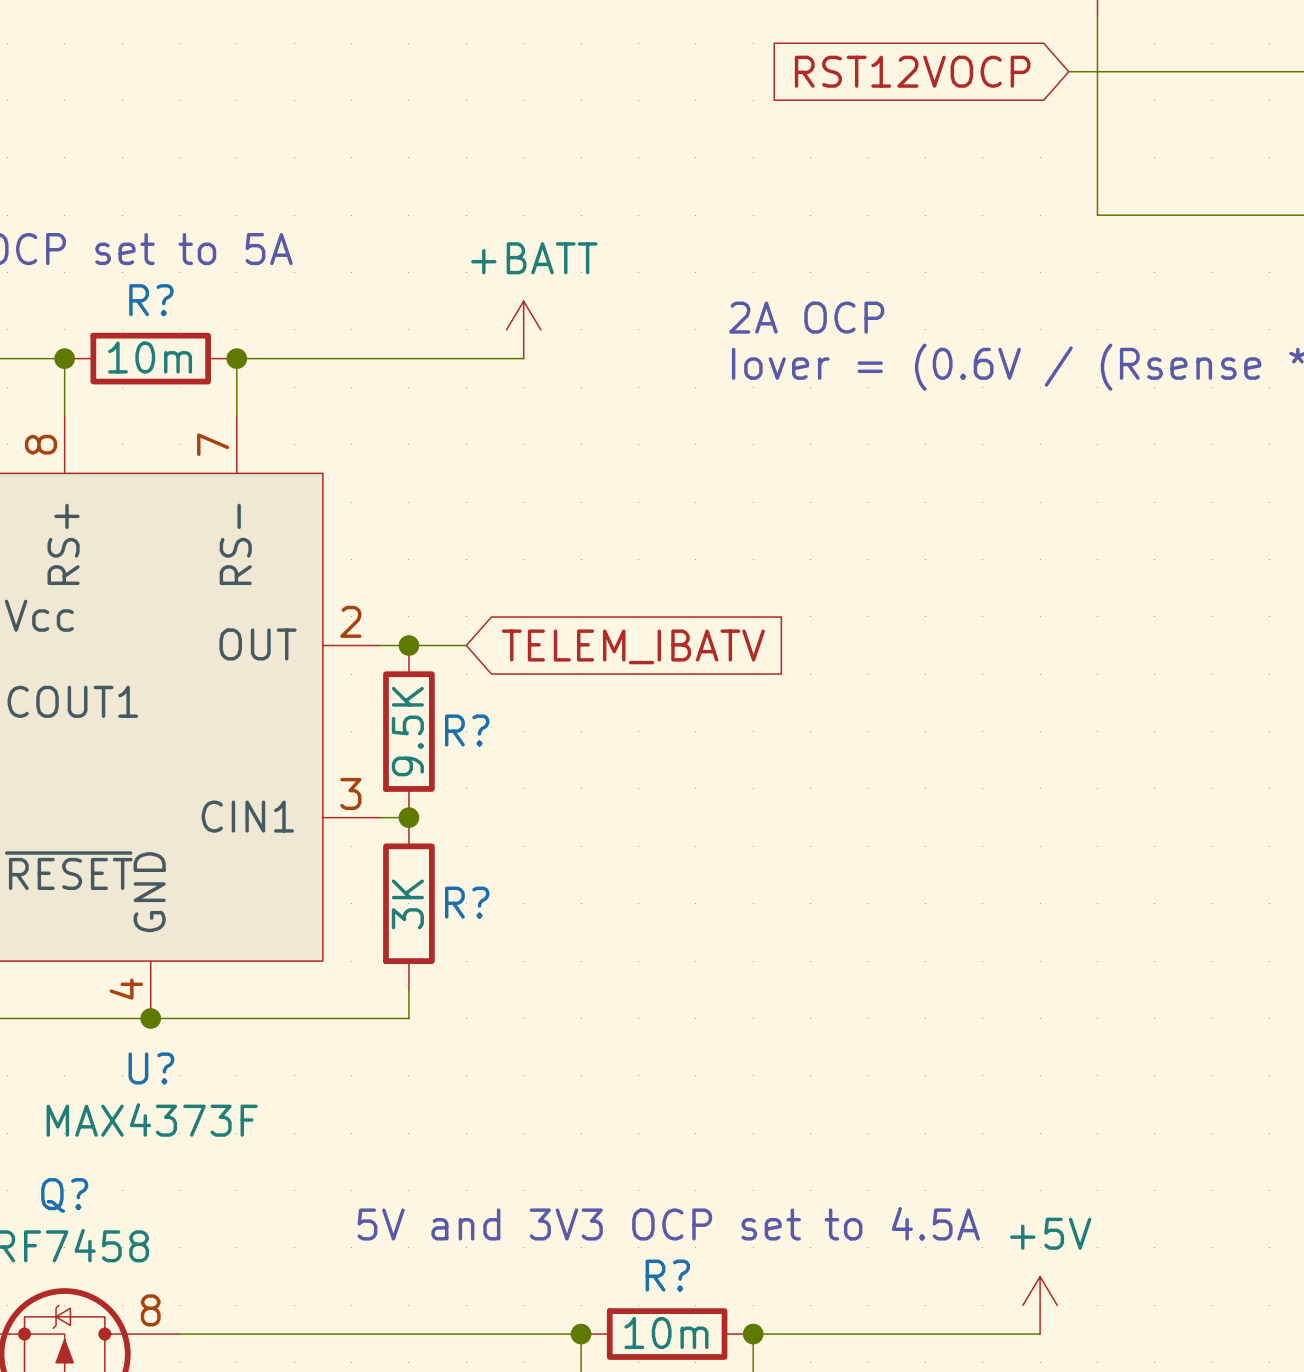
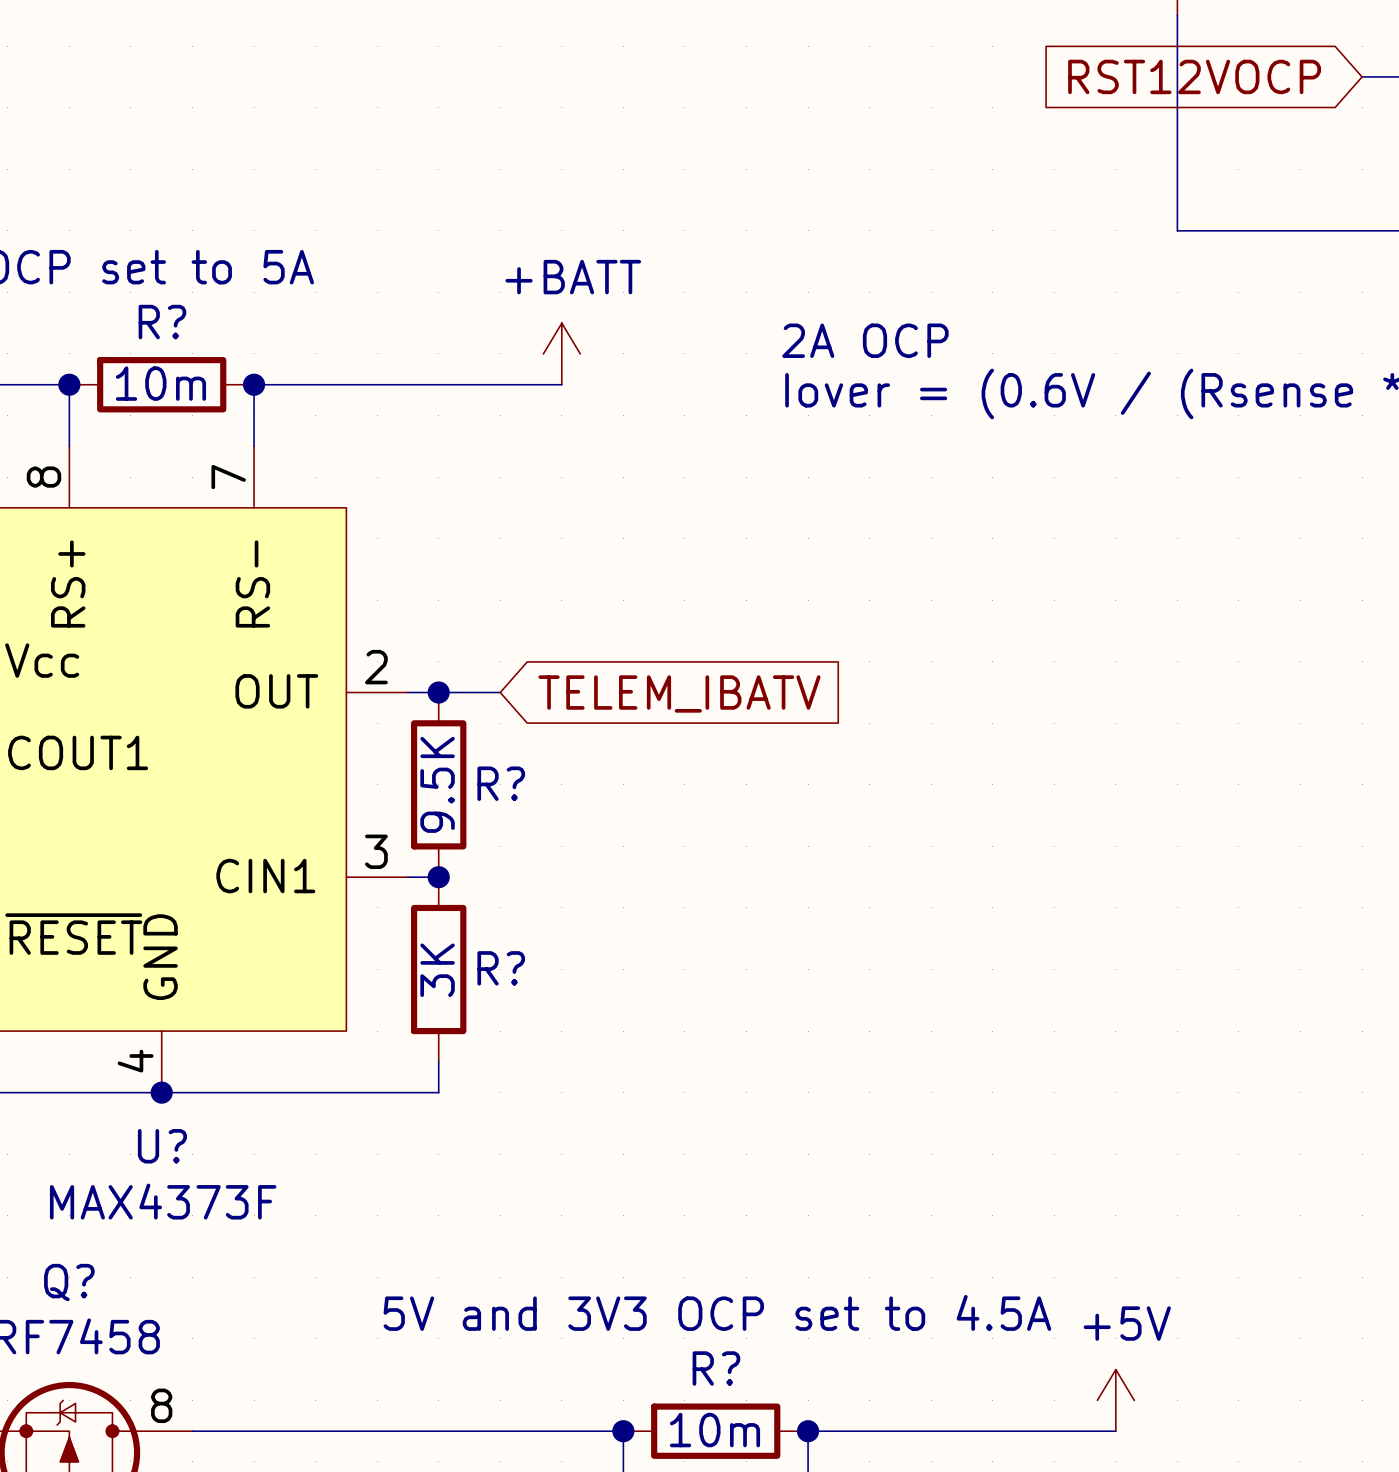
global label position: RST12VOCP (912, 71) -> RST12VOCP (1194, 76)
wire: (1068, 71) (1269, 71) -> none

